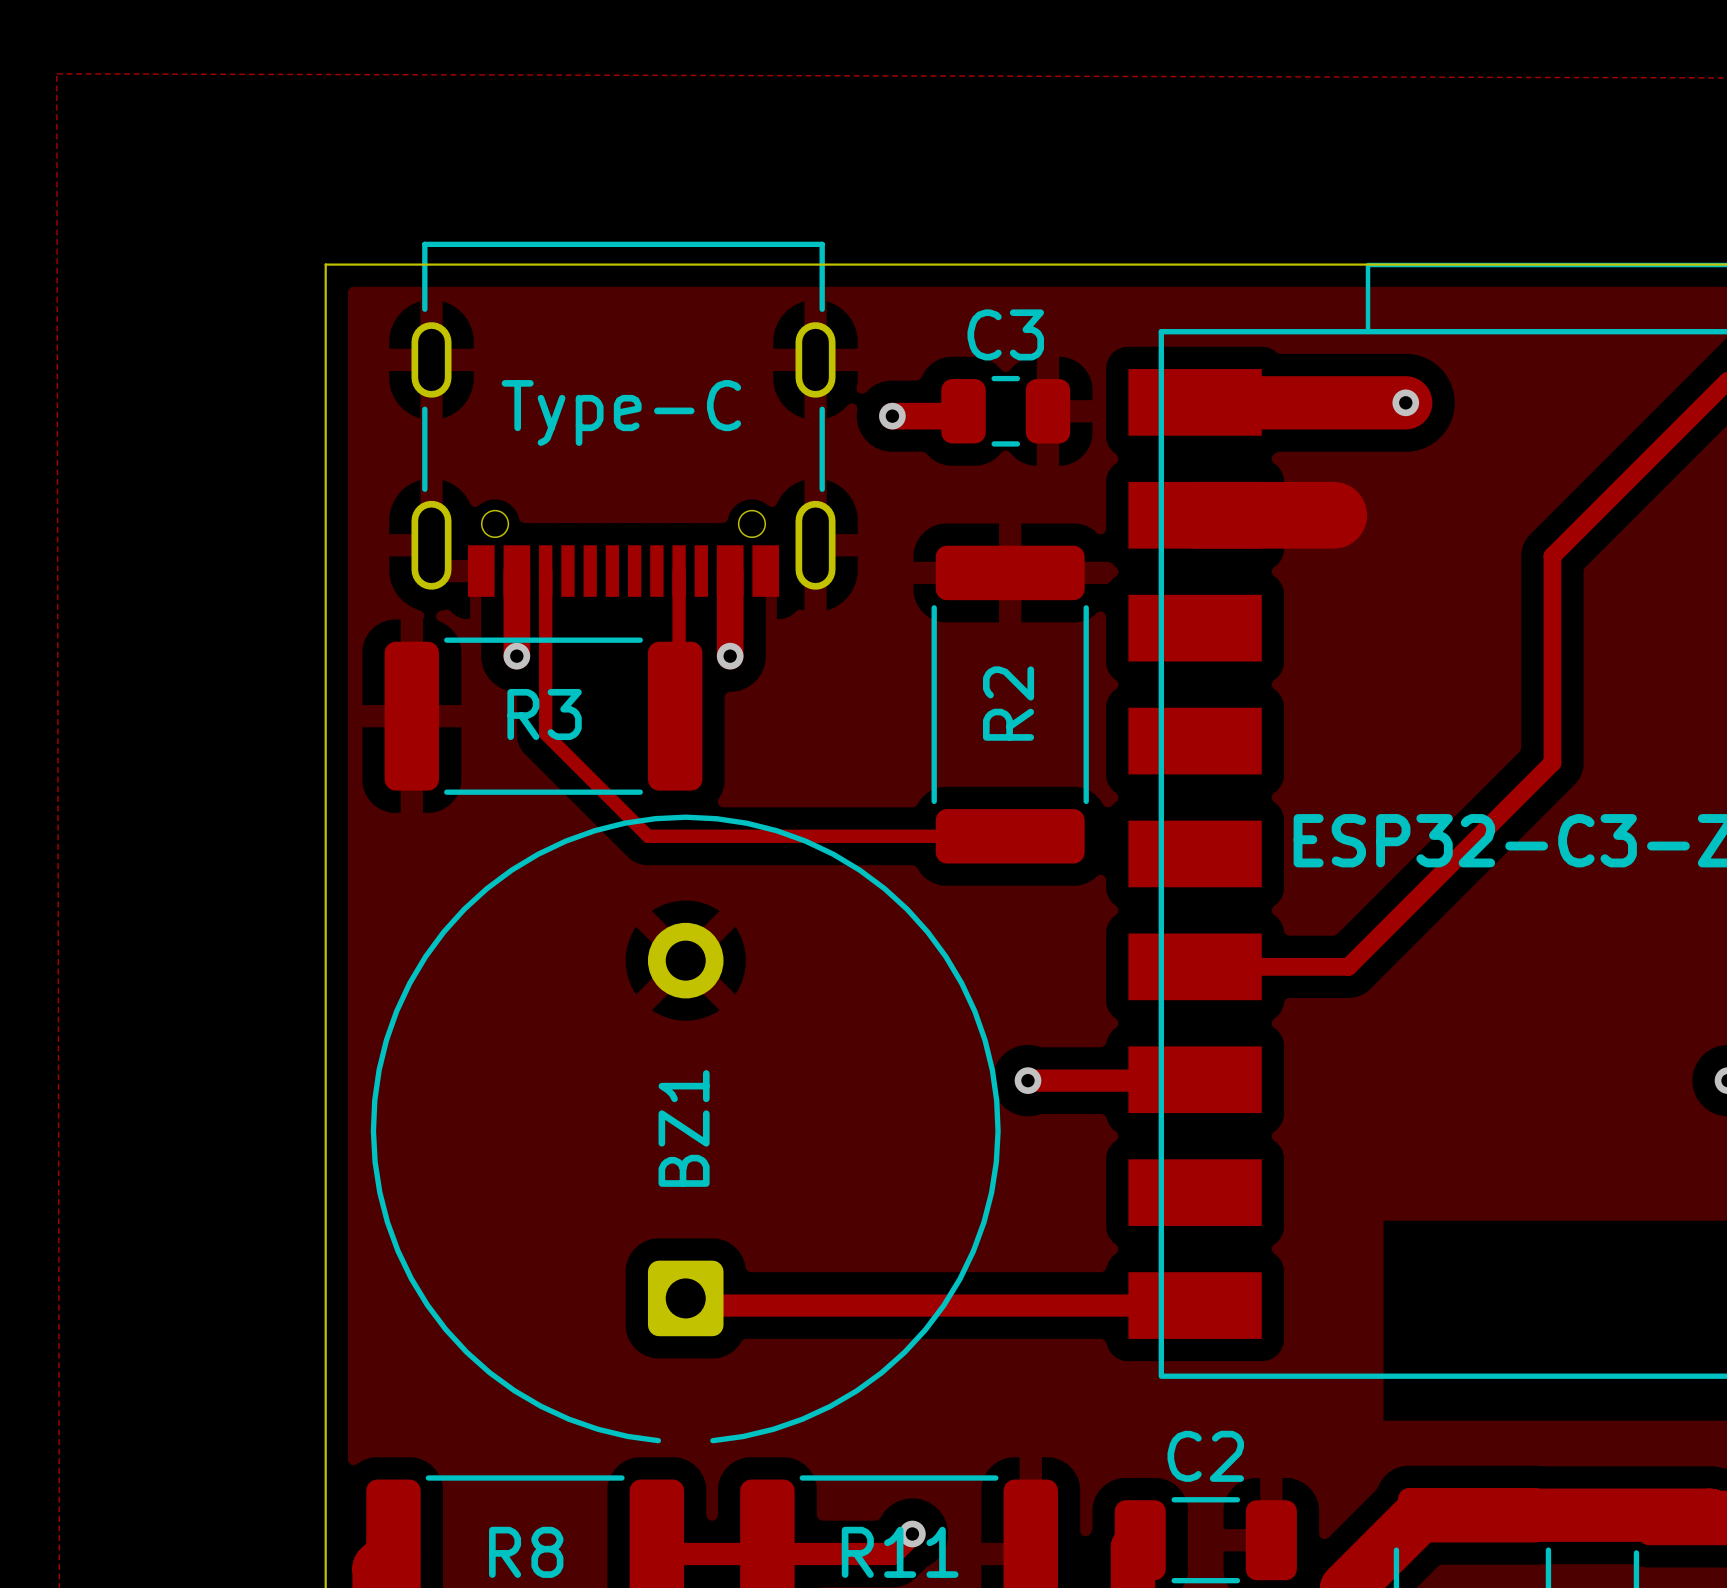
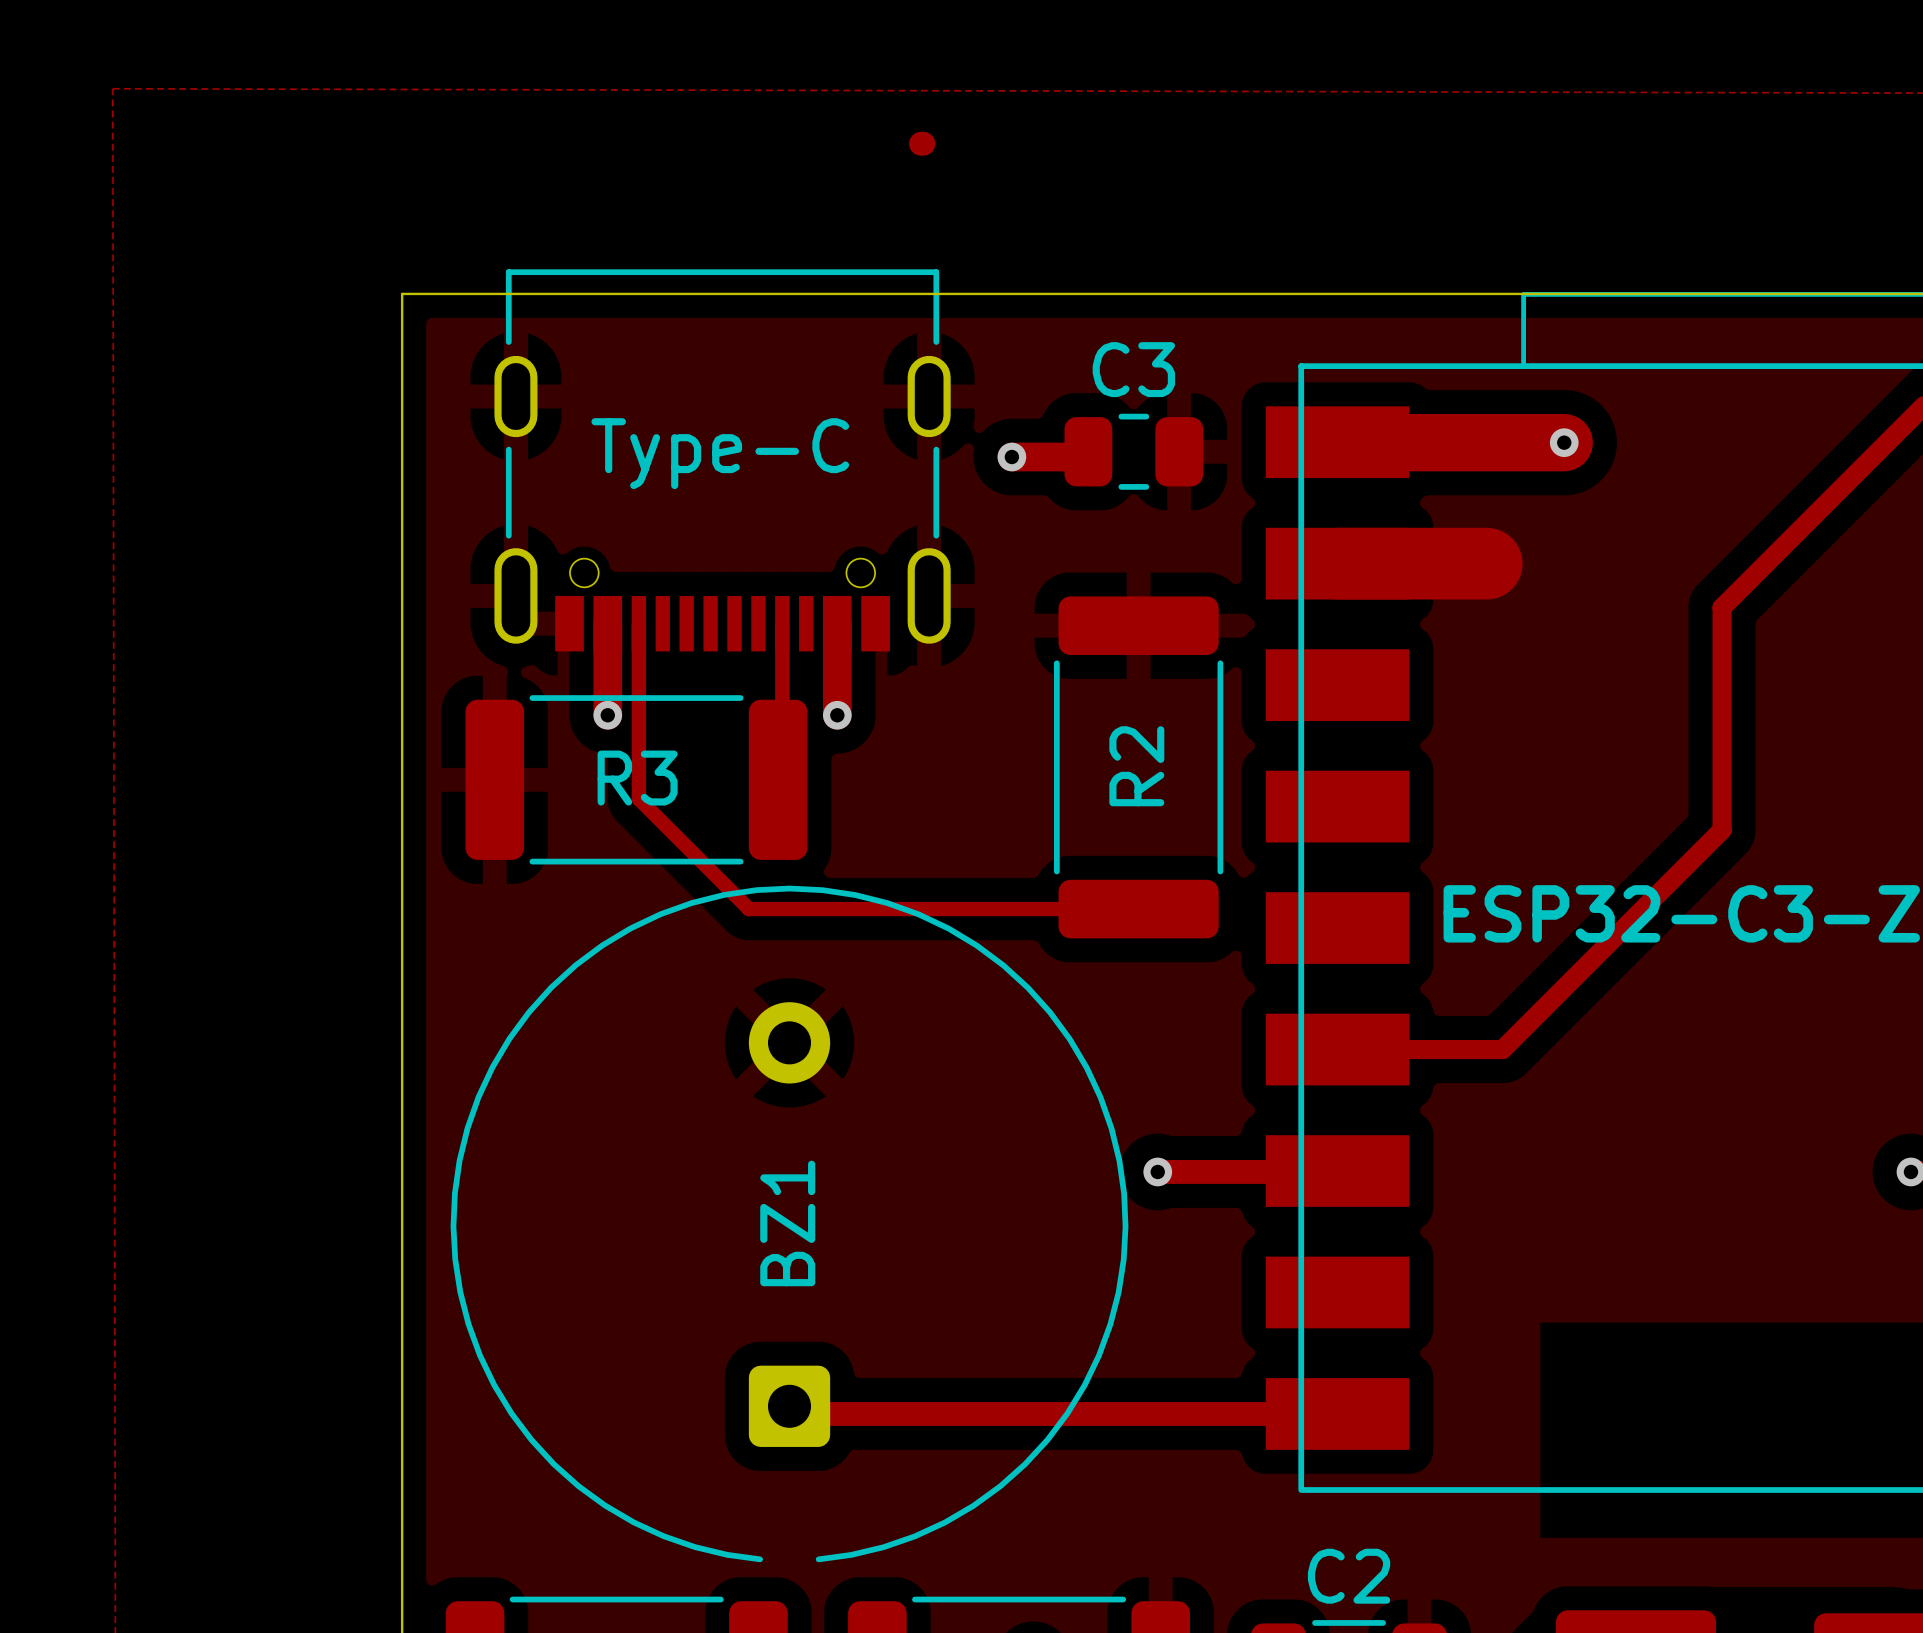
track: none -> (921, 143) (923, 143)

